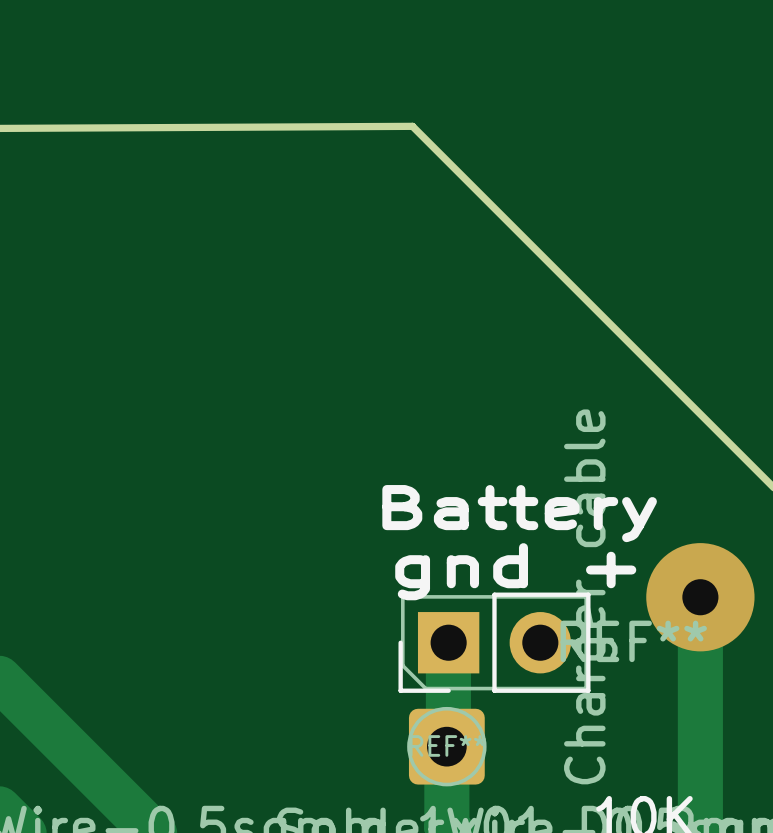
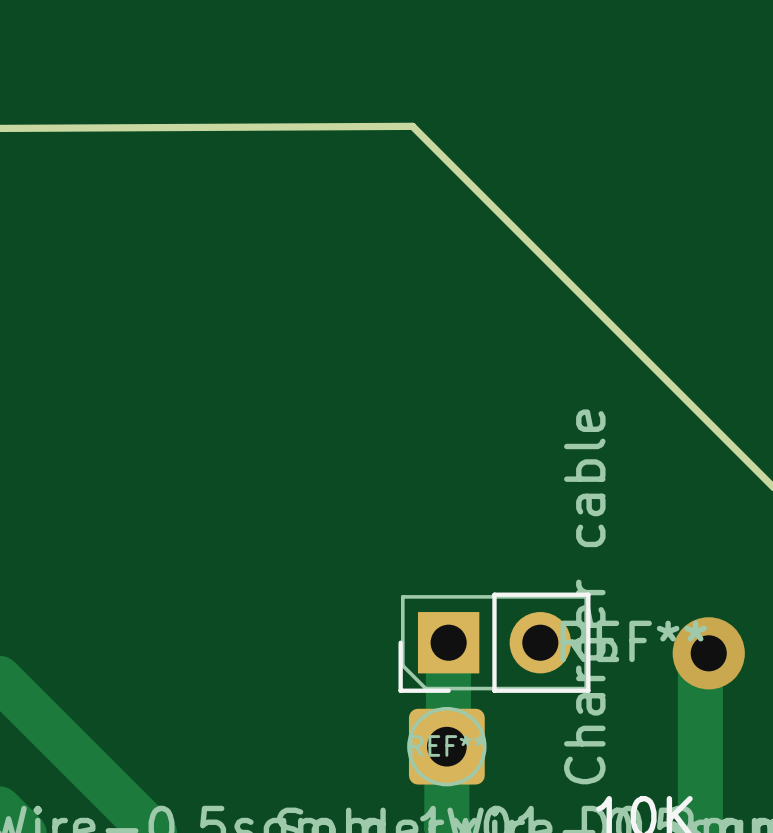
text: Battery (519, 513) -> none
text: gnd + (515, 571) -> none
via: (700, 597) -> none
via: none -> (708, 653)

